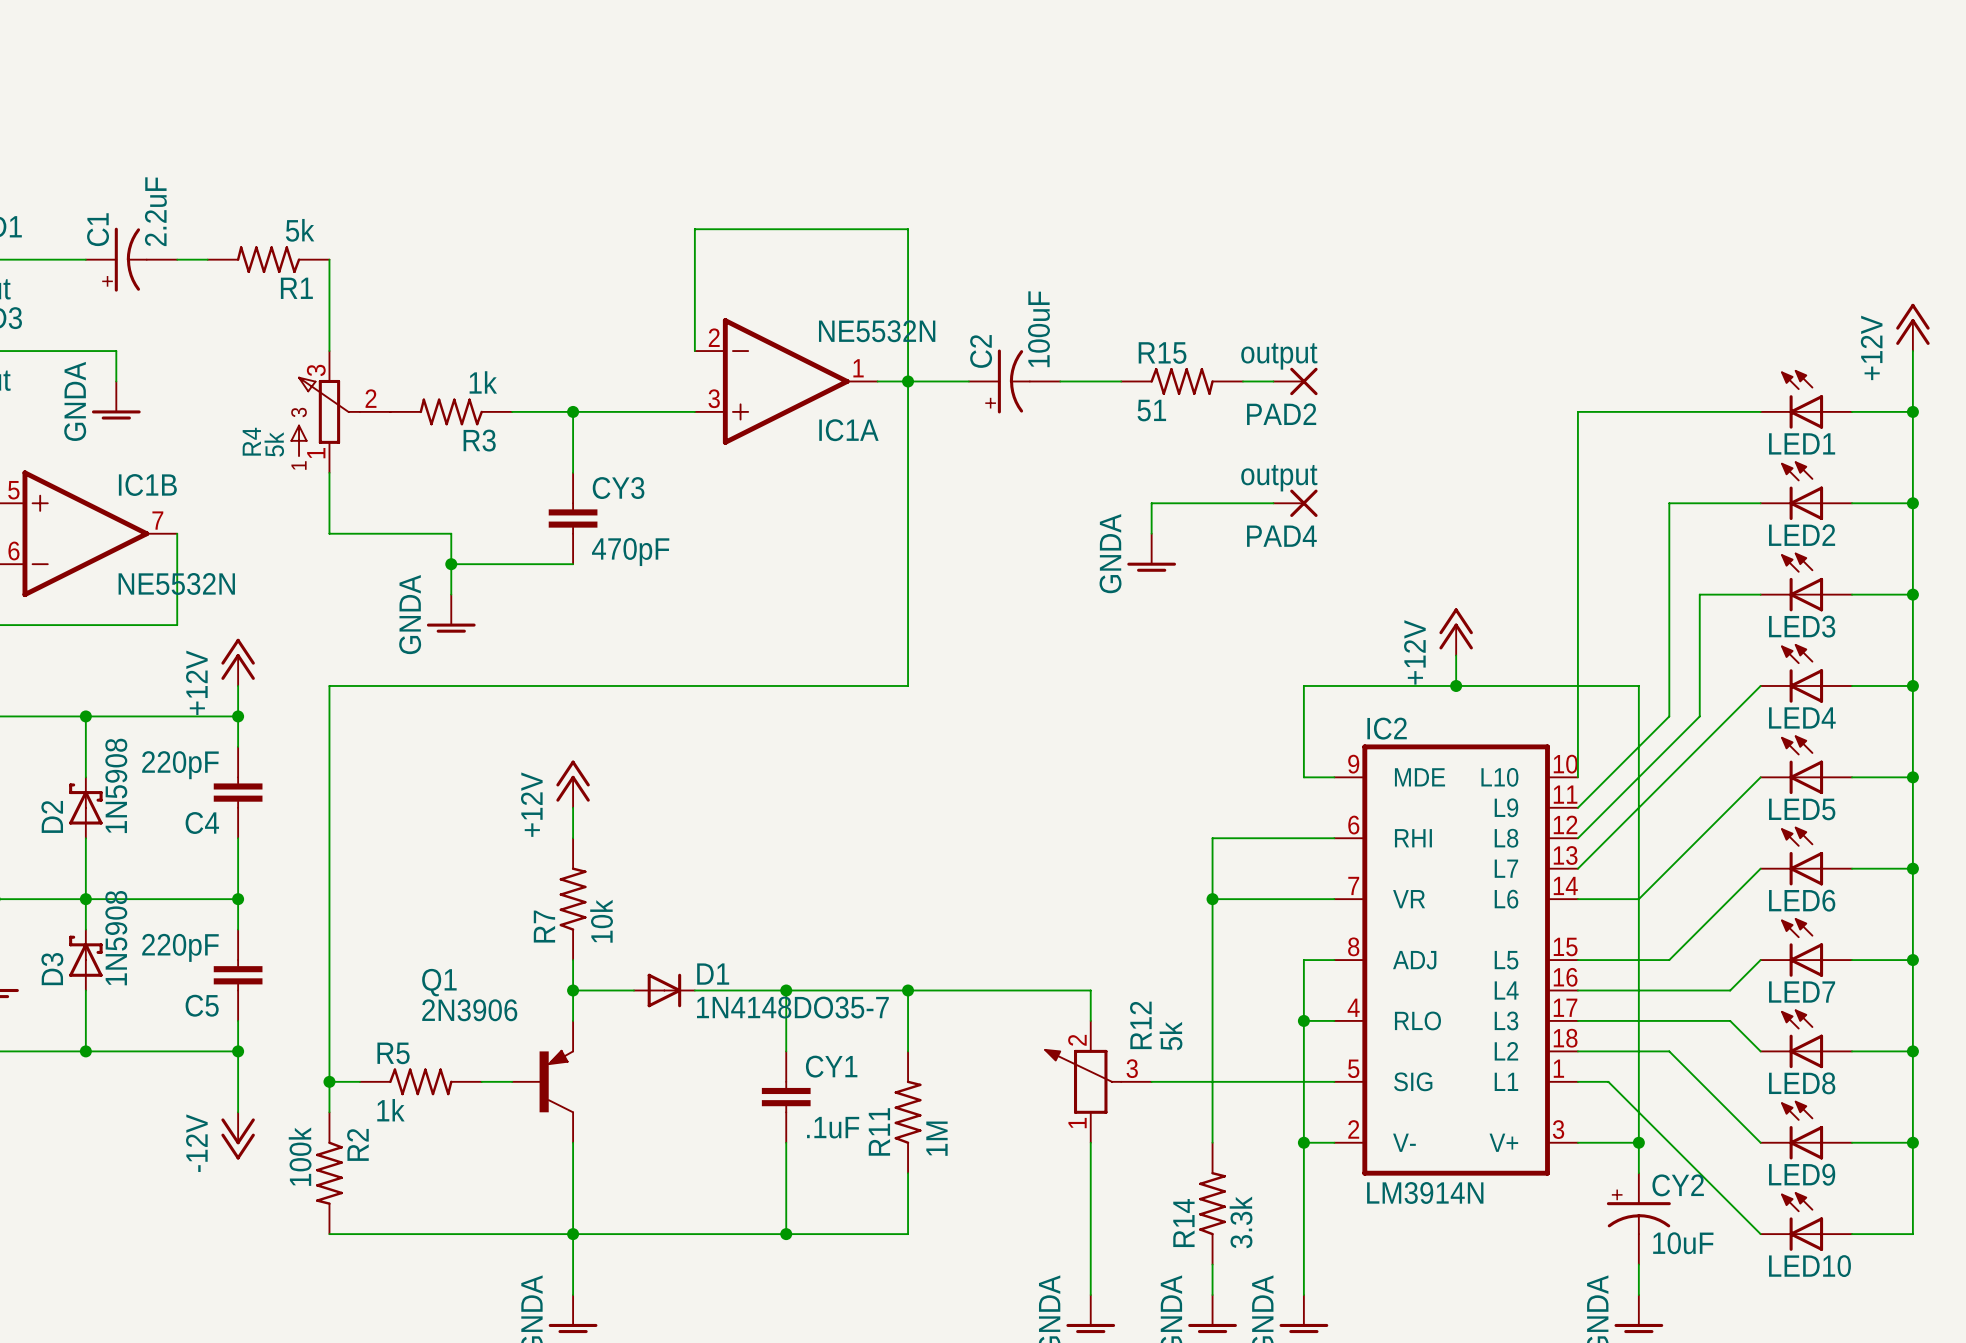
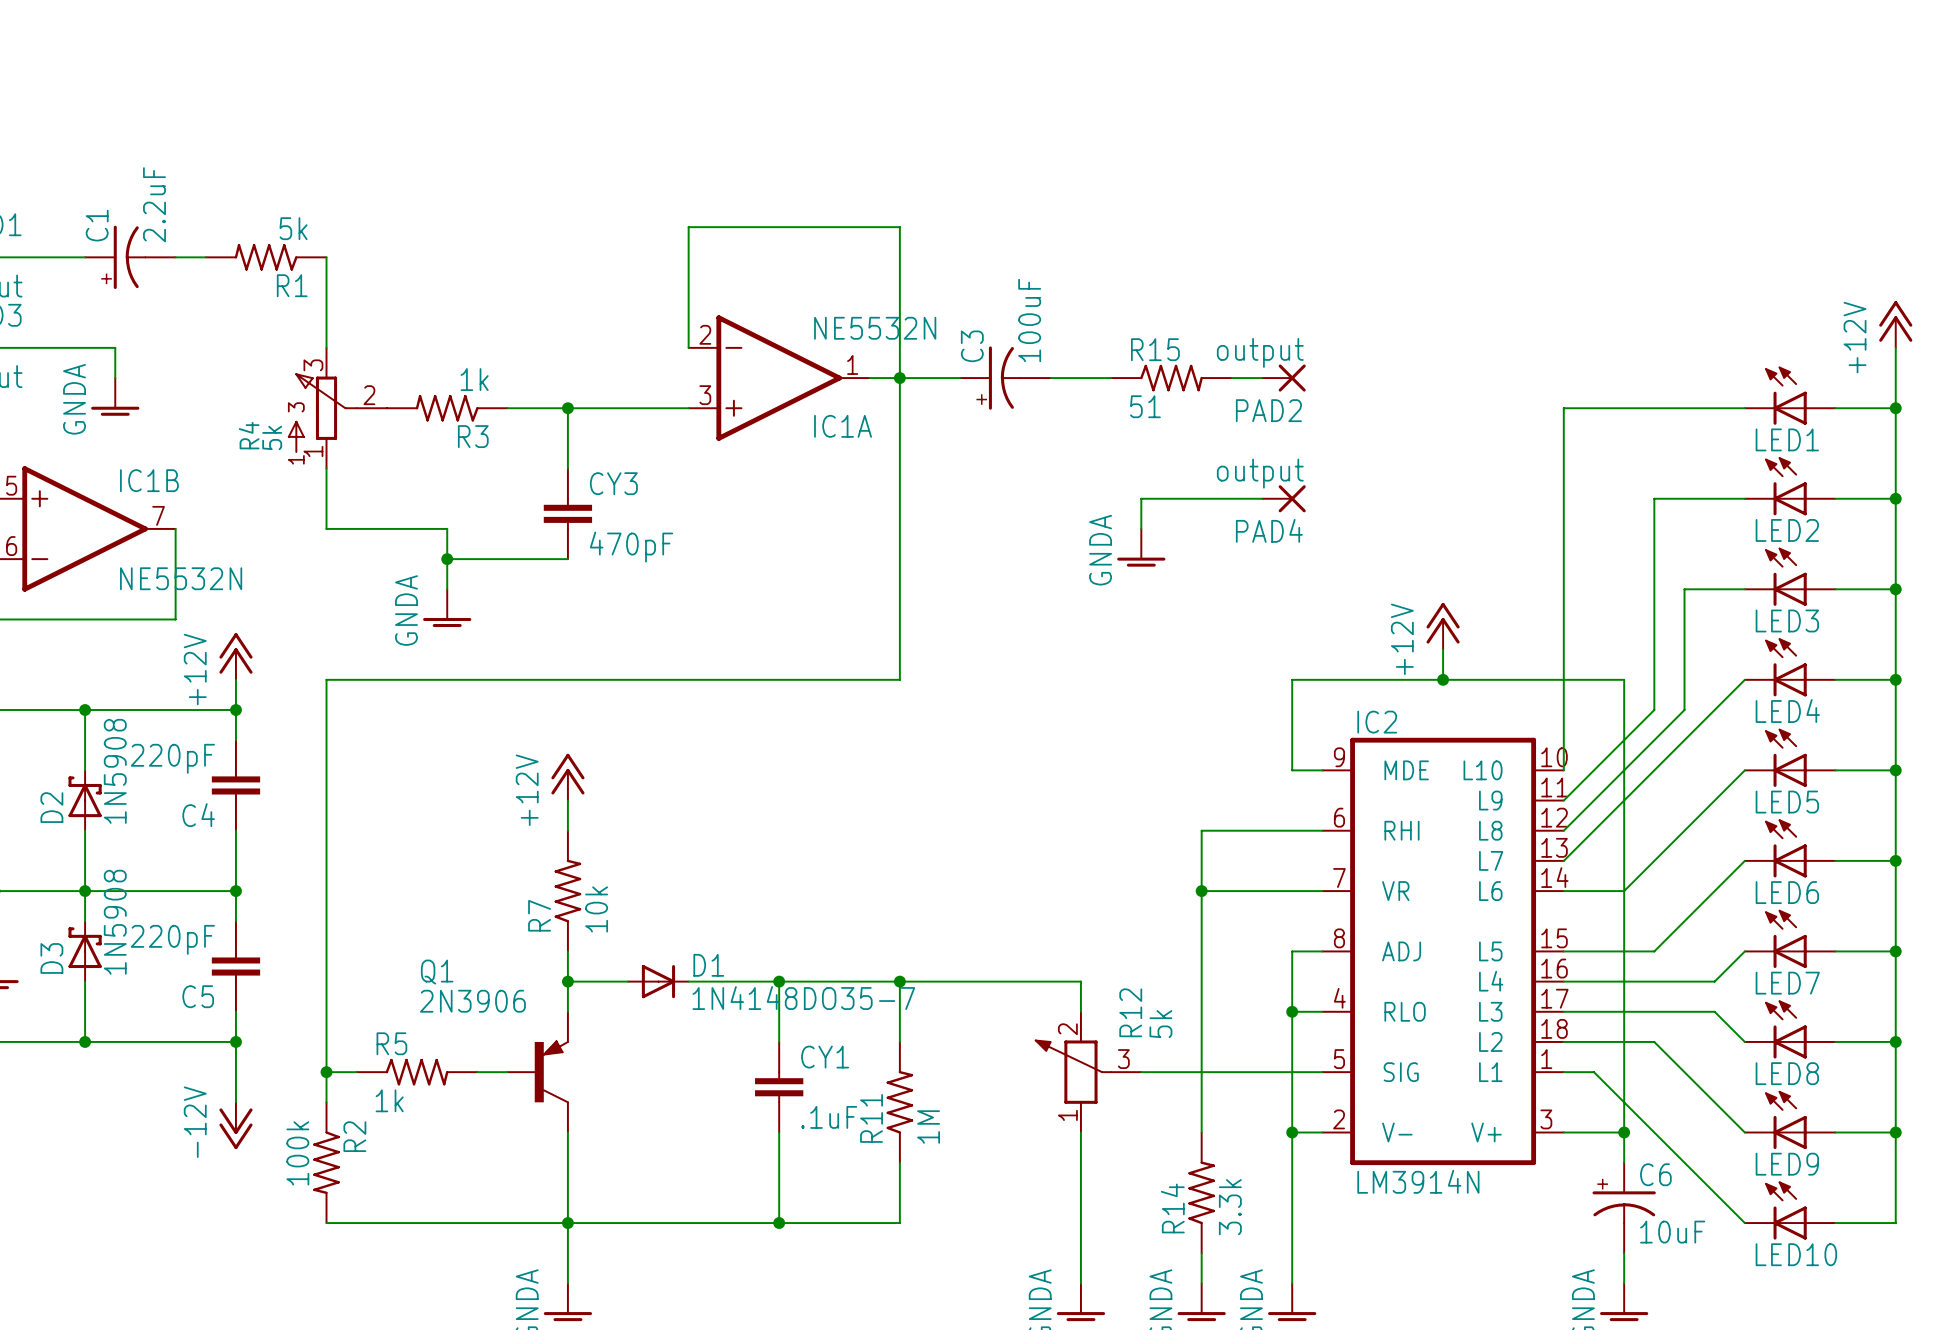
C2 name: C2 (981, 351) -> C3 (972, 346)
CY2 name: CY2 (1678, 1185) -> C6 (1655, 1174)

